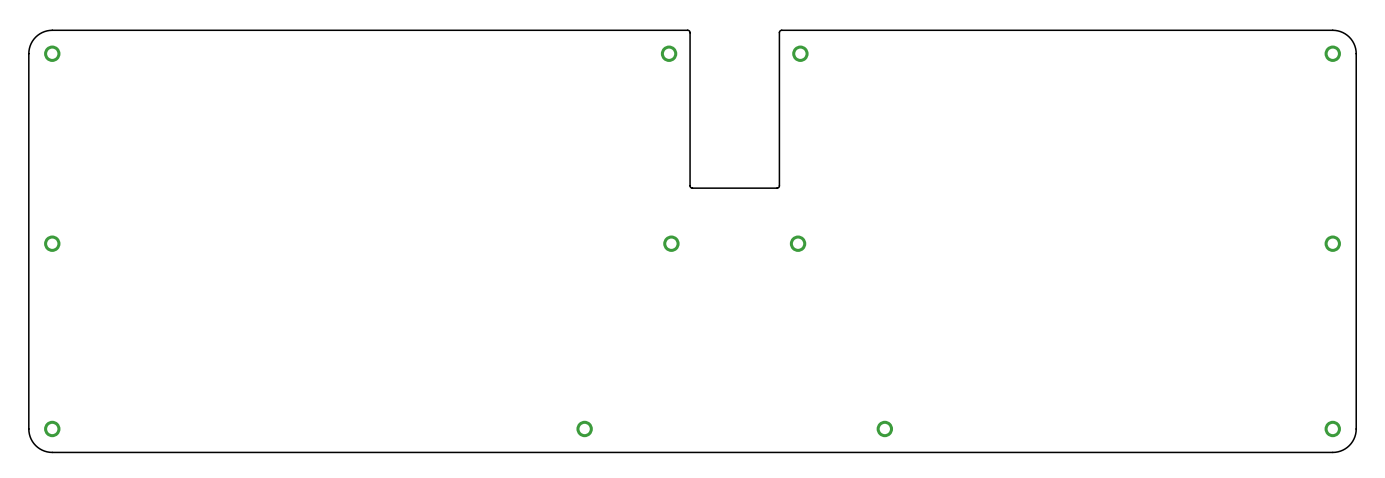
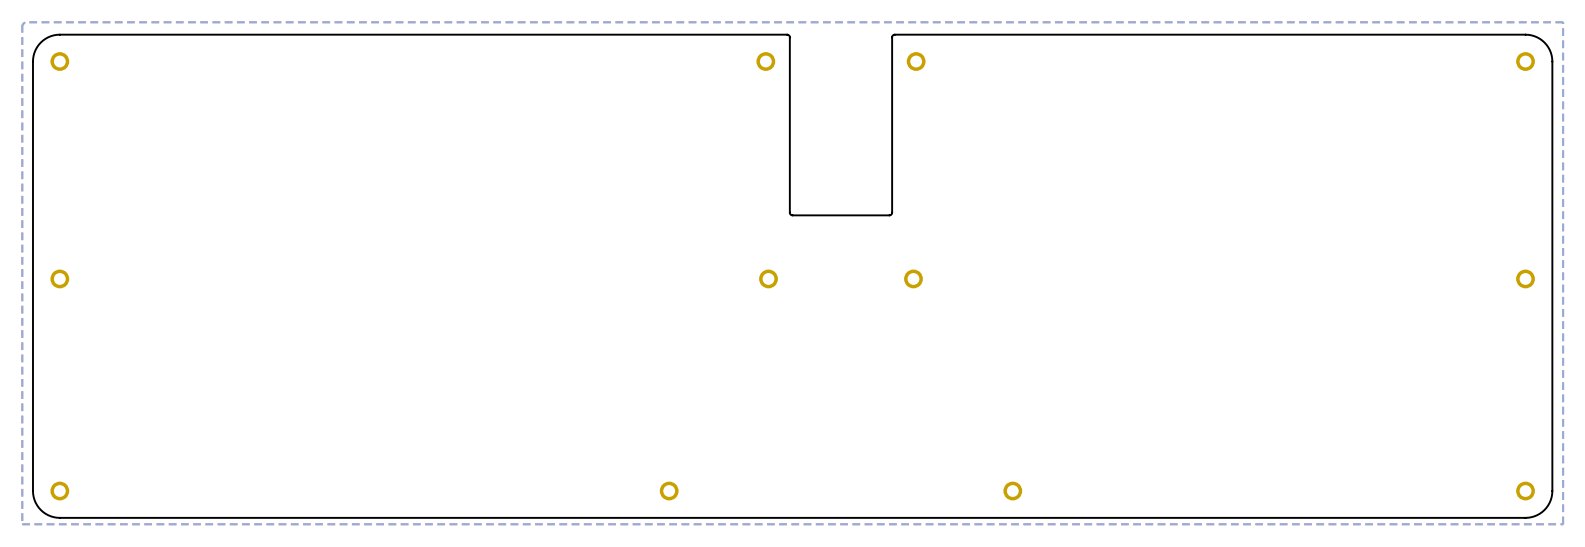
bottom zone outline: none -> (1563, 22) (24, 22) (22, 24) (22, 524) (1563, 524) (1563, 22)

